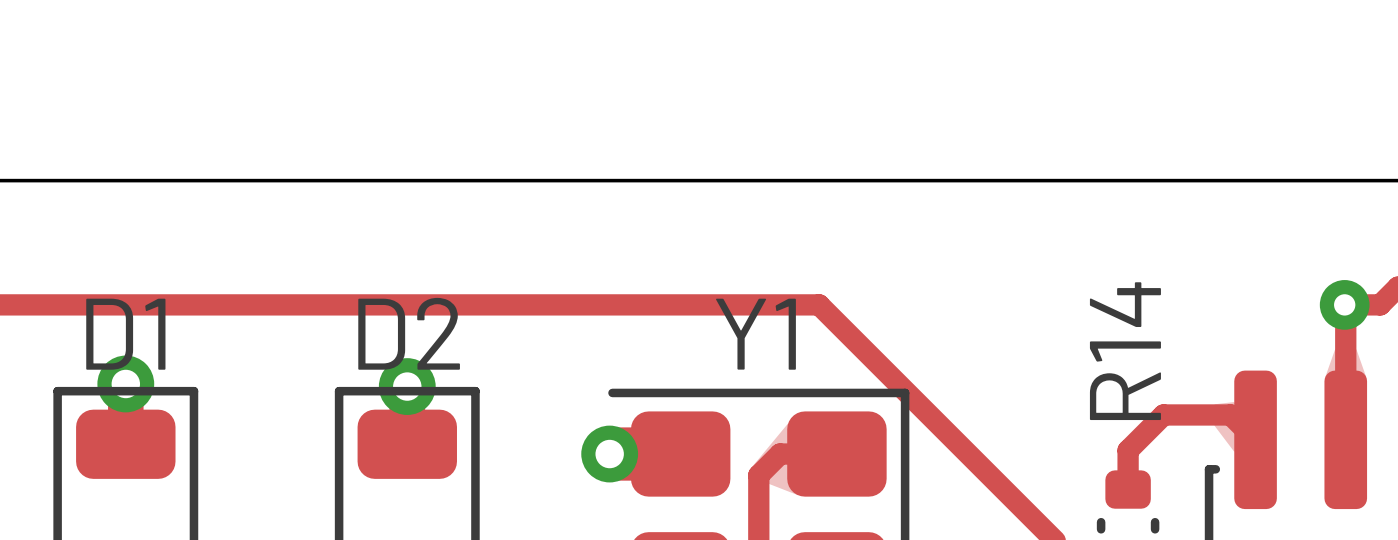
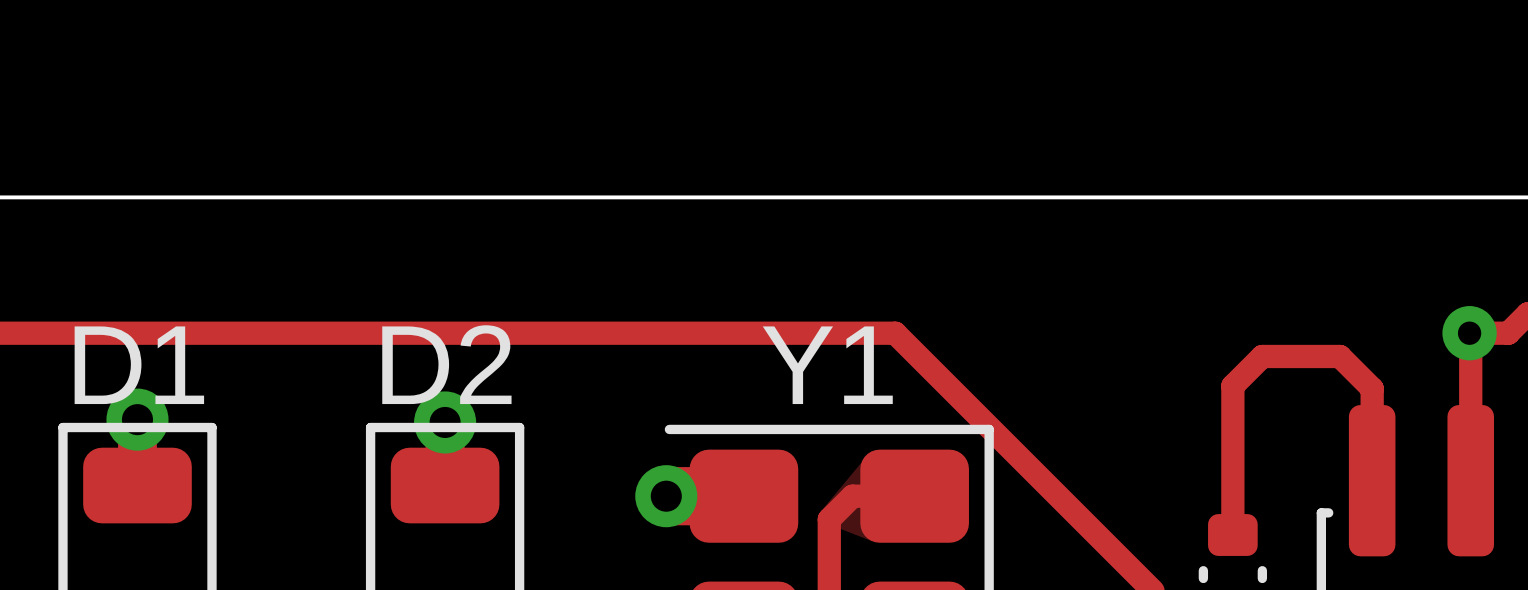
R14 name: R14 (1125, 351) -> none
track: (1255, 439) (1230, 414) (1163, 414) (1128, 450) -> (1372, 480) (1372, 388) (1339, 356) (1262, 356) (1232, 385) (1232, 492)

